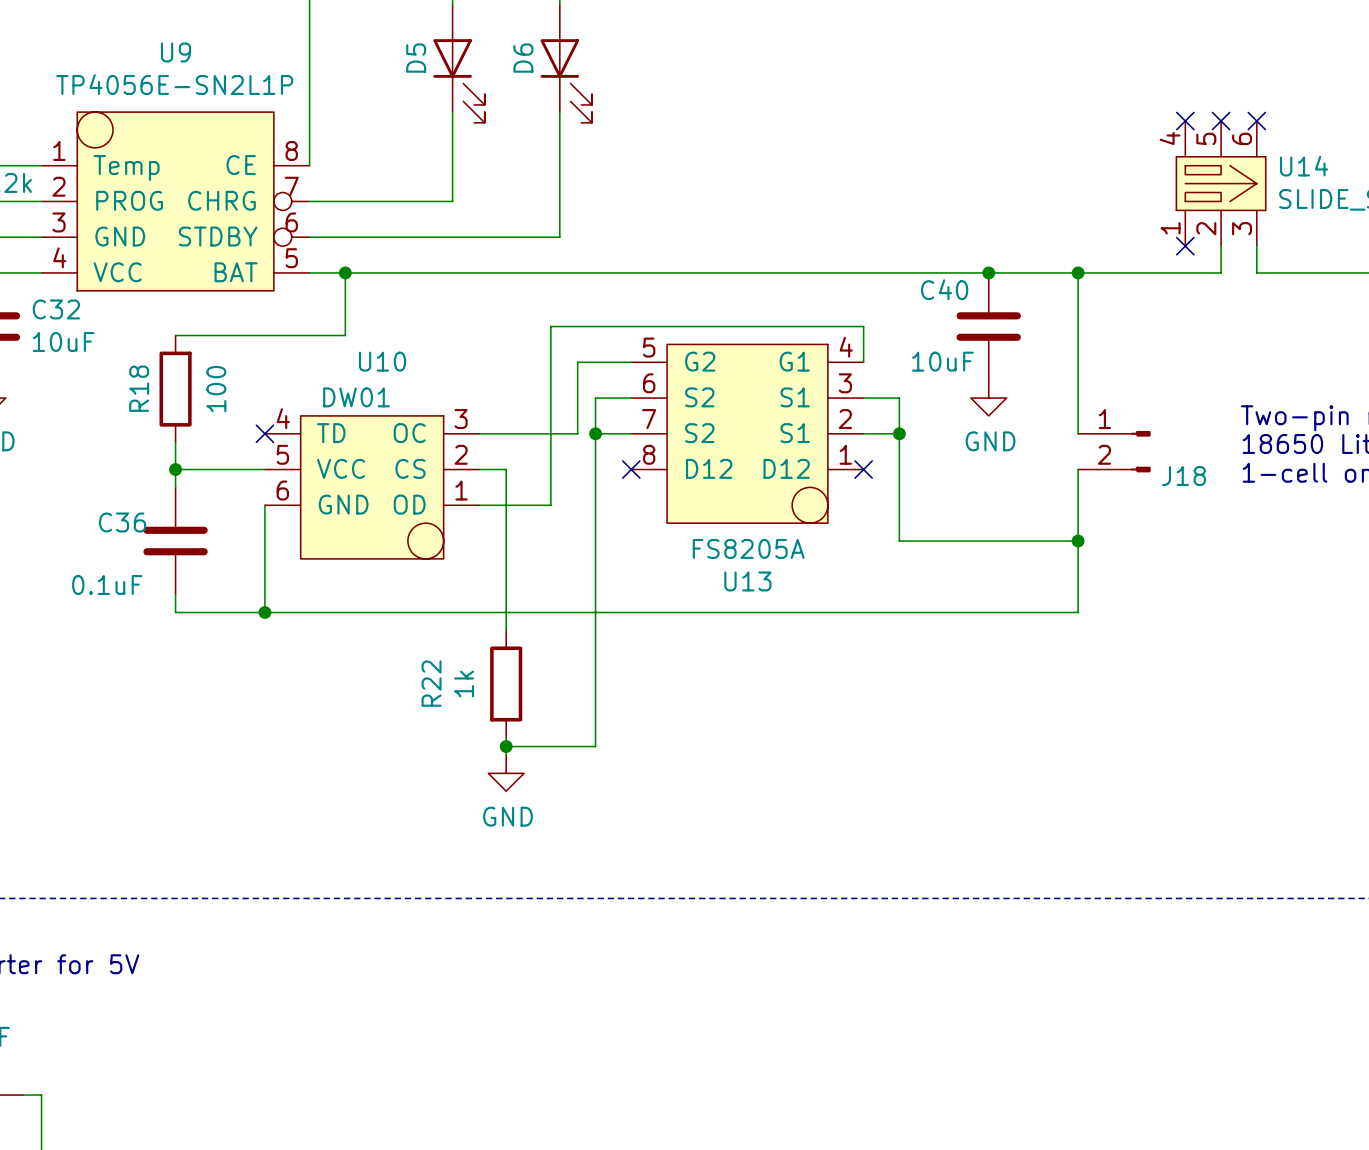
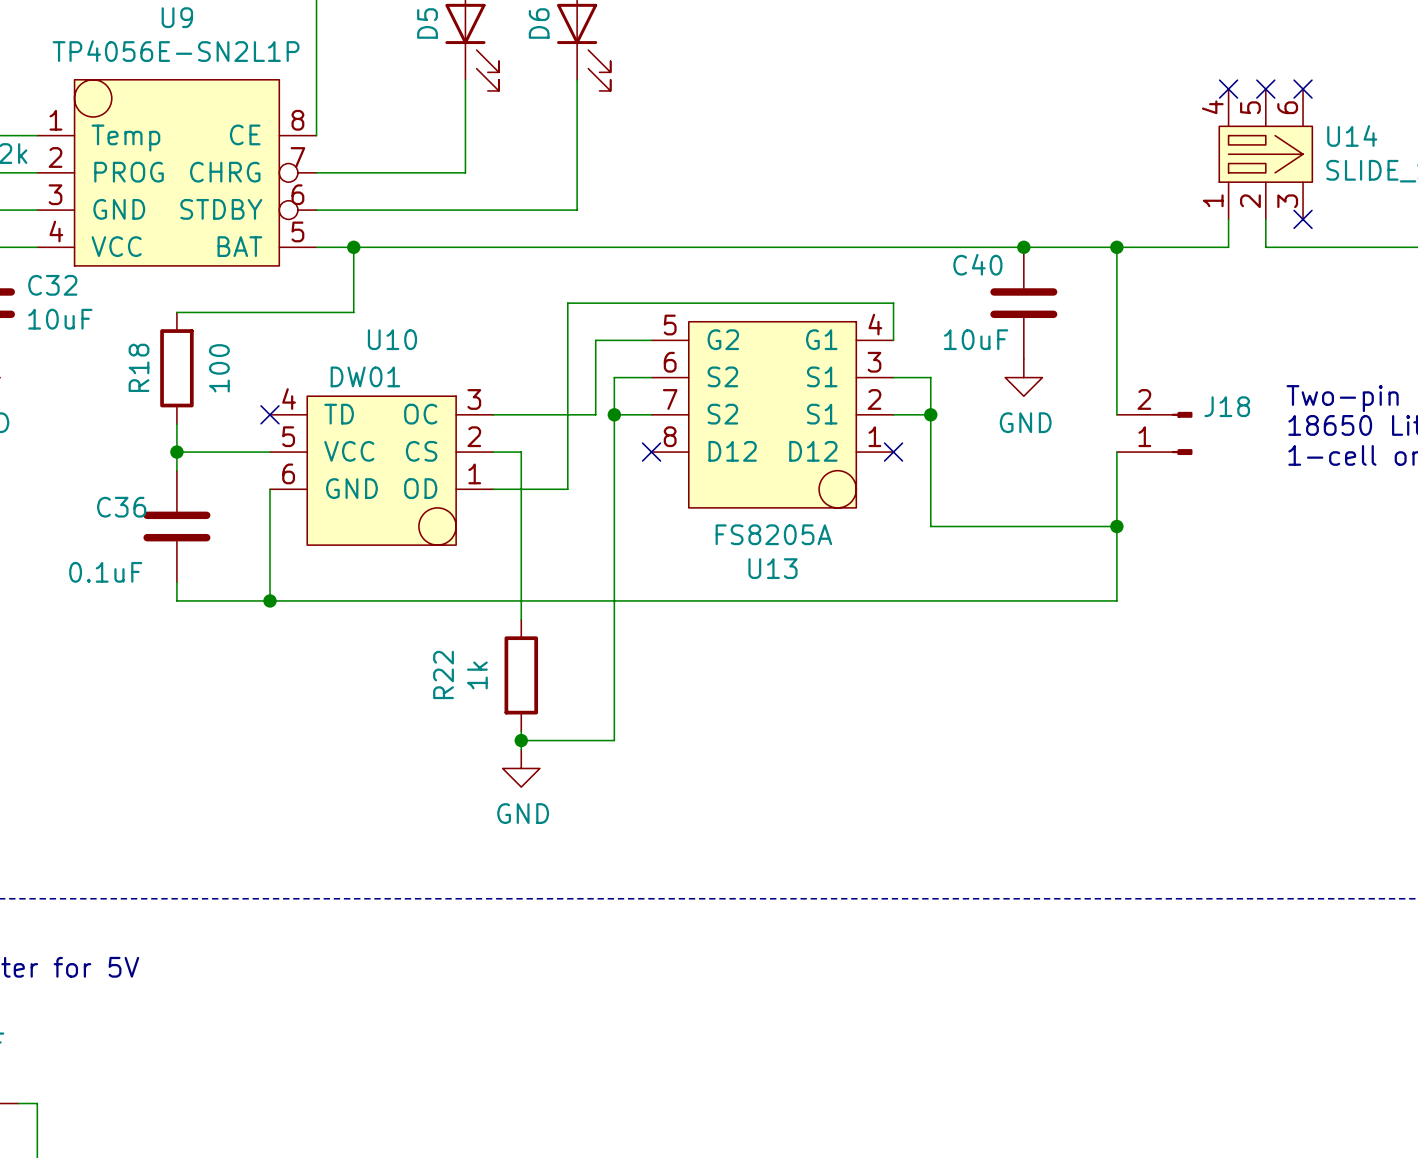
no-connect mark position: (1185, 246) -> (1303, 219)
wire: (1256, 246) (1256, 272) -> (1265, 247) (1303, 247)
wire: (1185, 272) (1221, 272) -> (1228, 247) (1228, 219)
J18 flip: as is (1140, 451) -> up-down (1182, 433)

